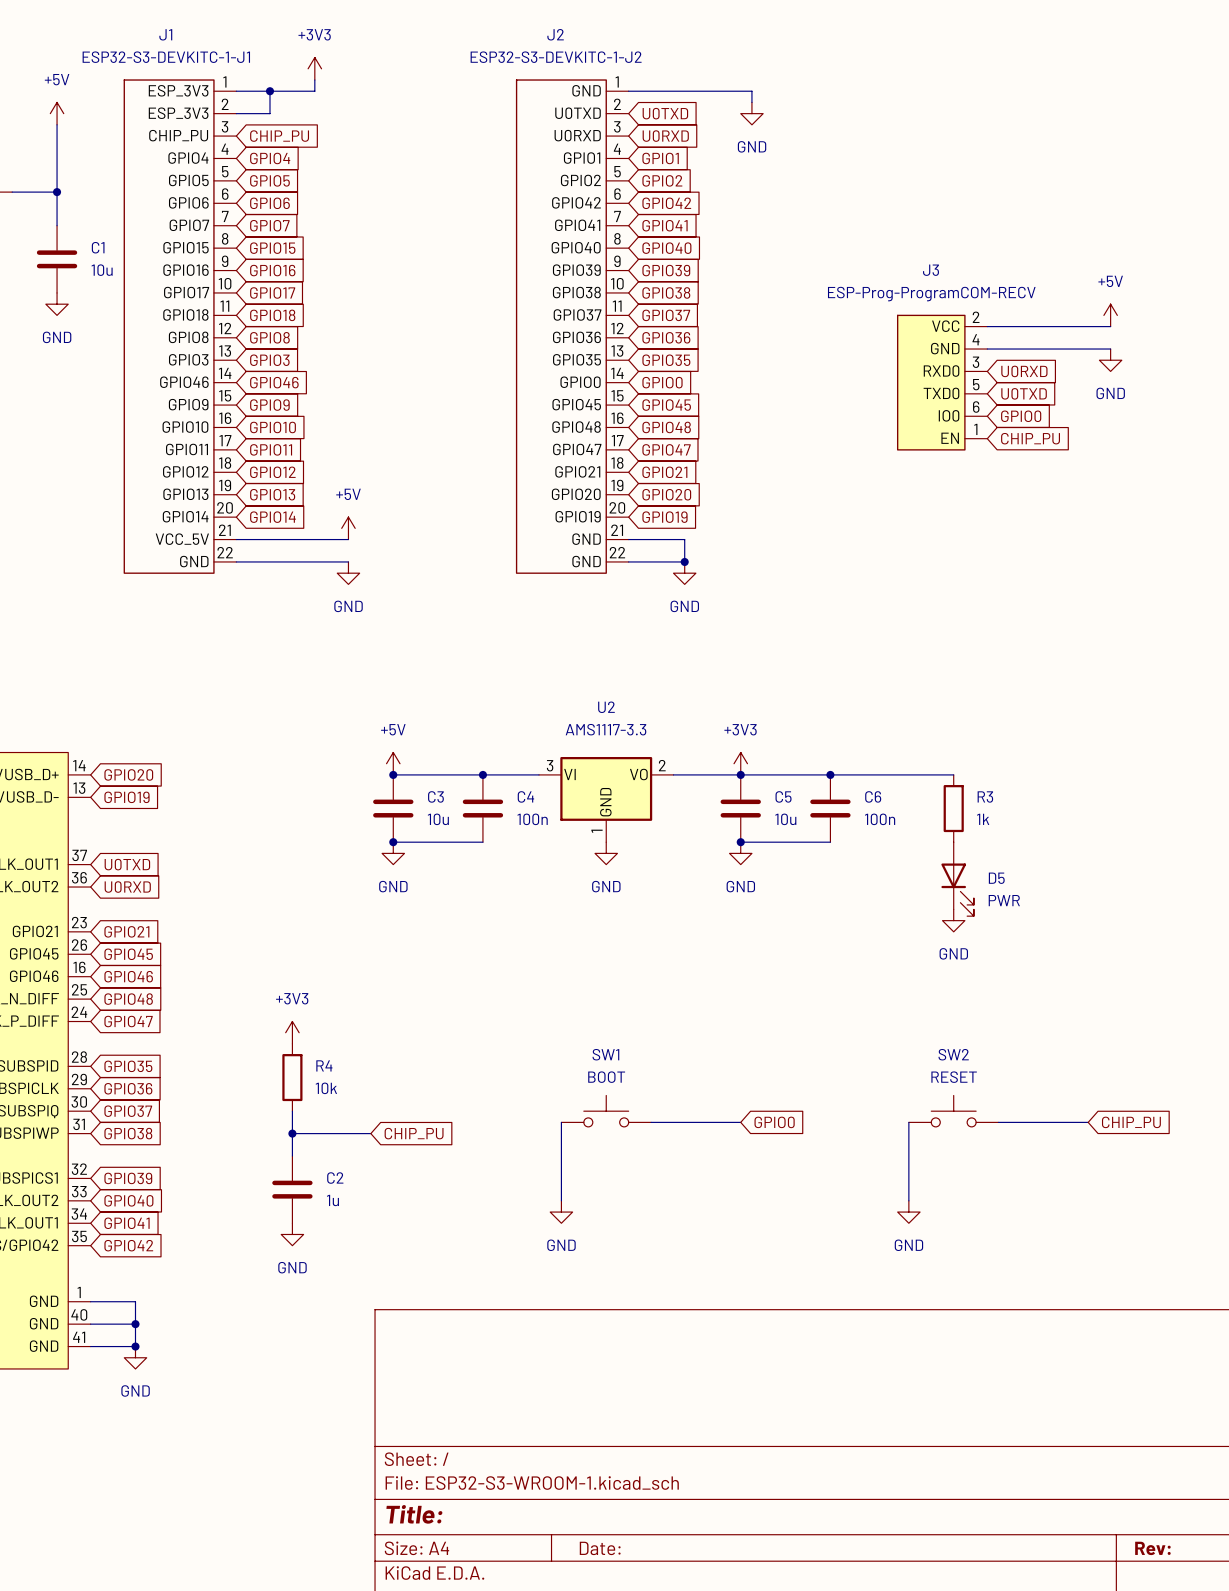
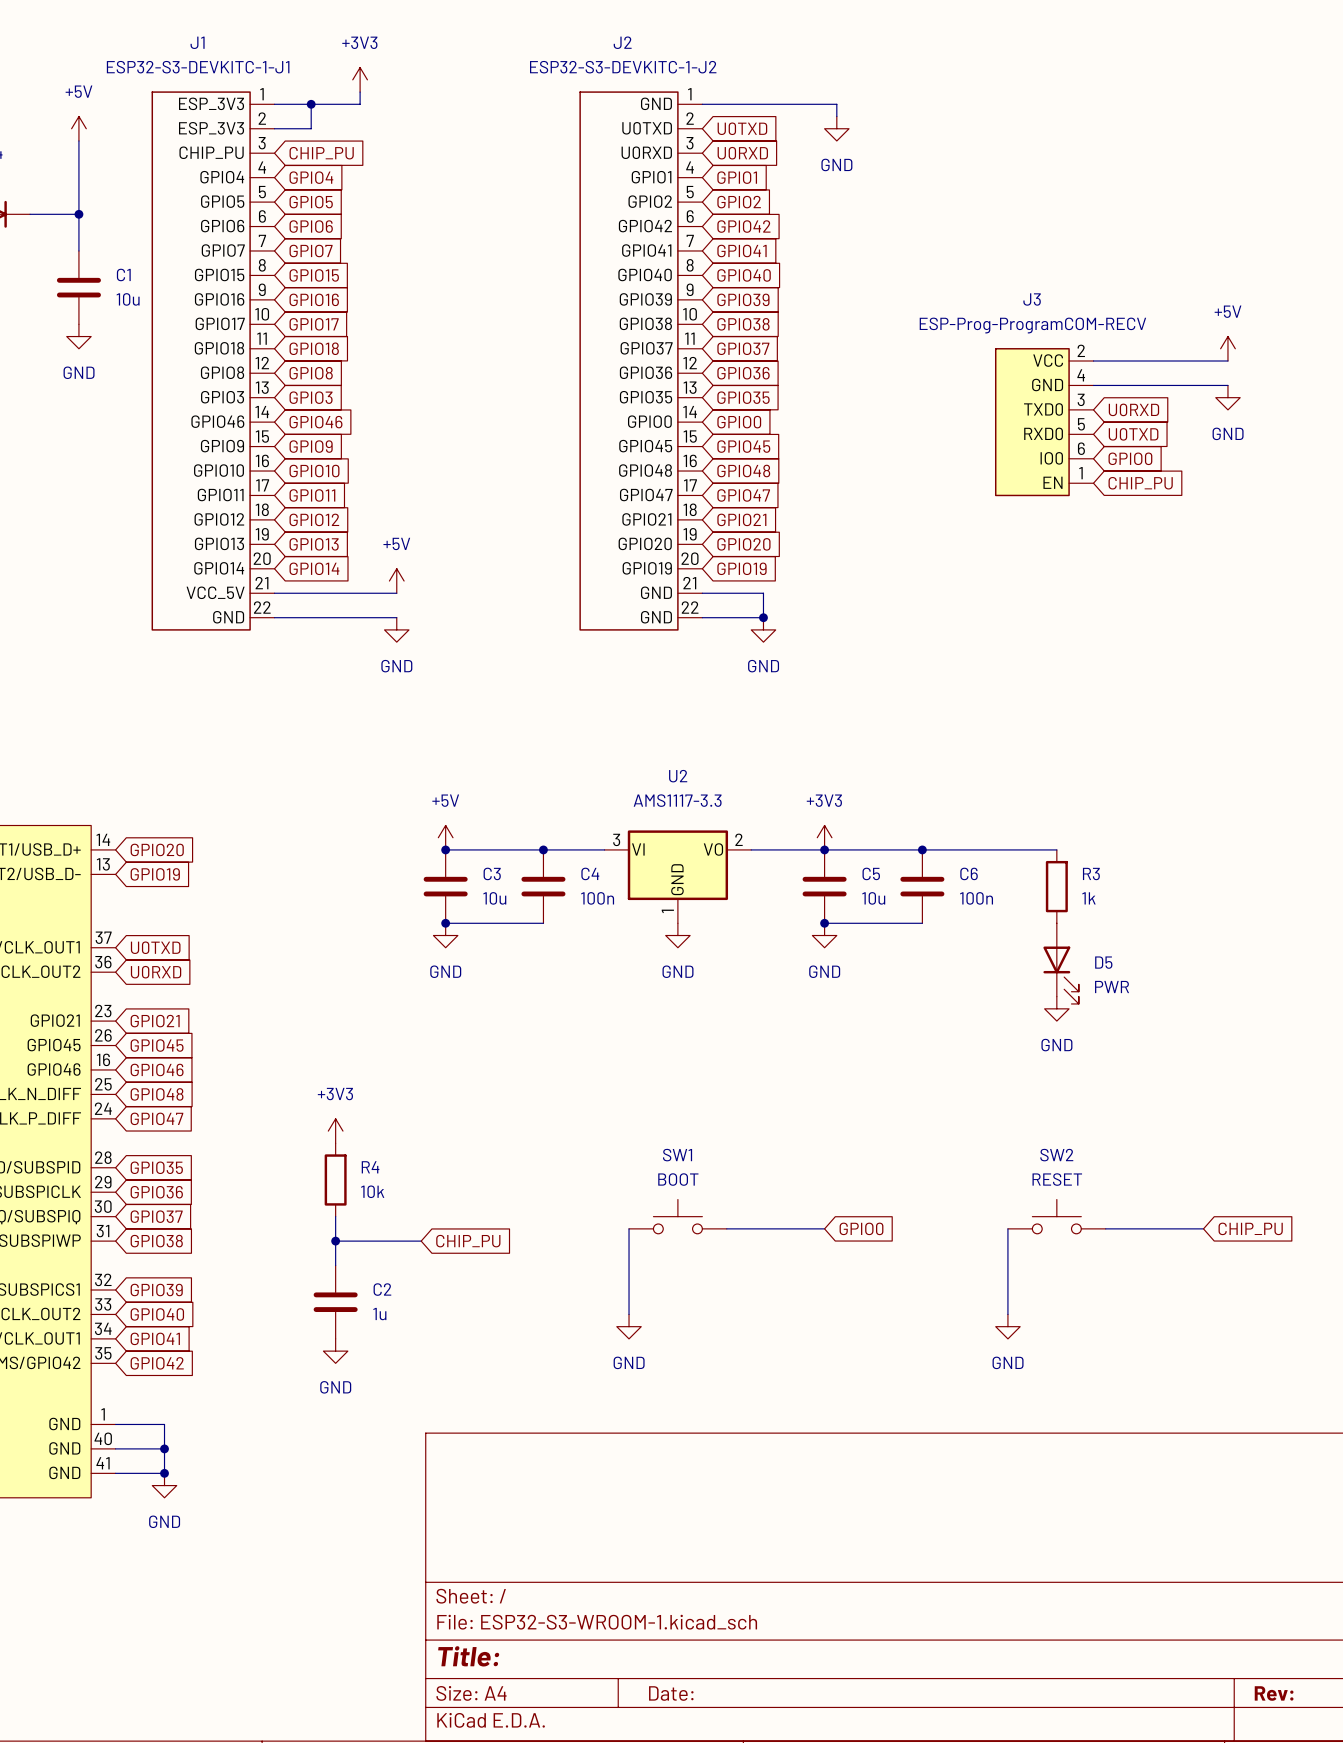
J3 pin name: RXD0 (941, 371) -> TXD0 (1043, 409)
J3 pin name: TXD0 (941, 393) -> RXD0 (1043, 433)

